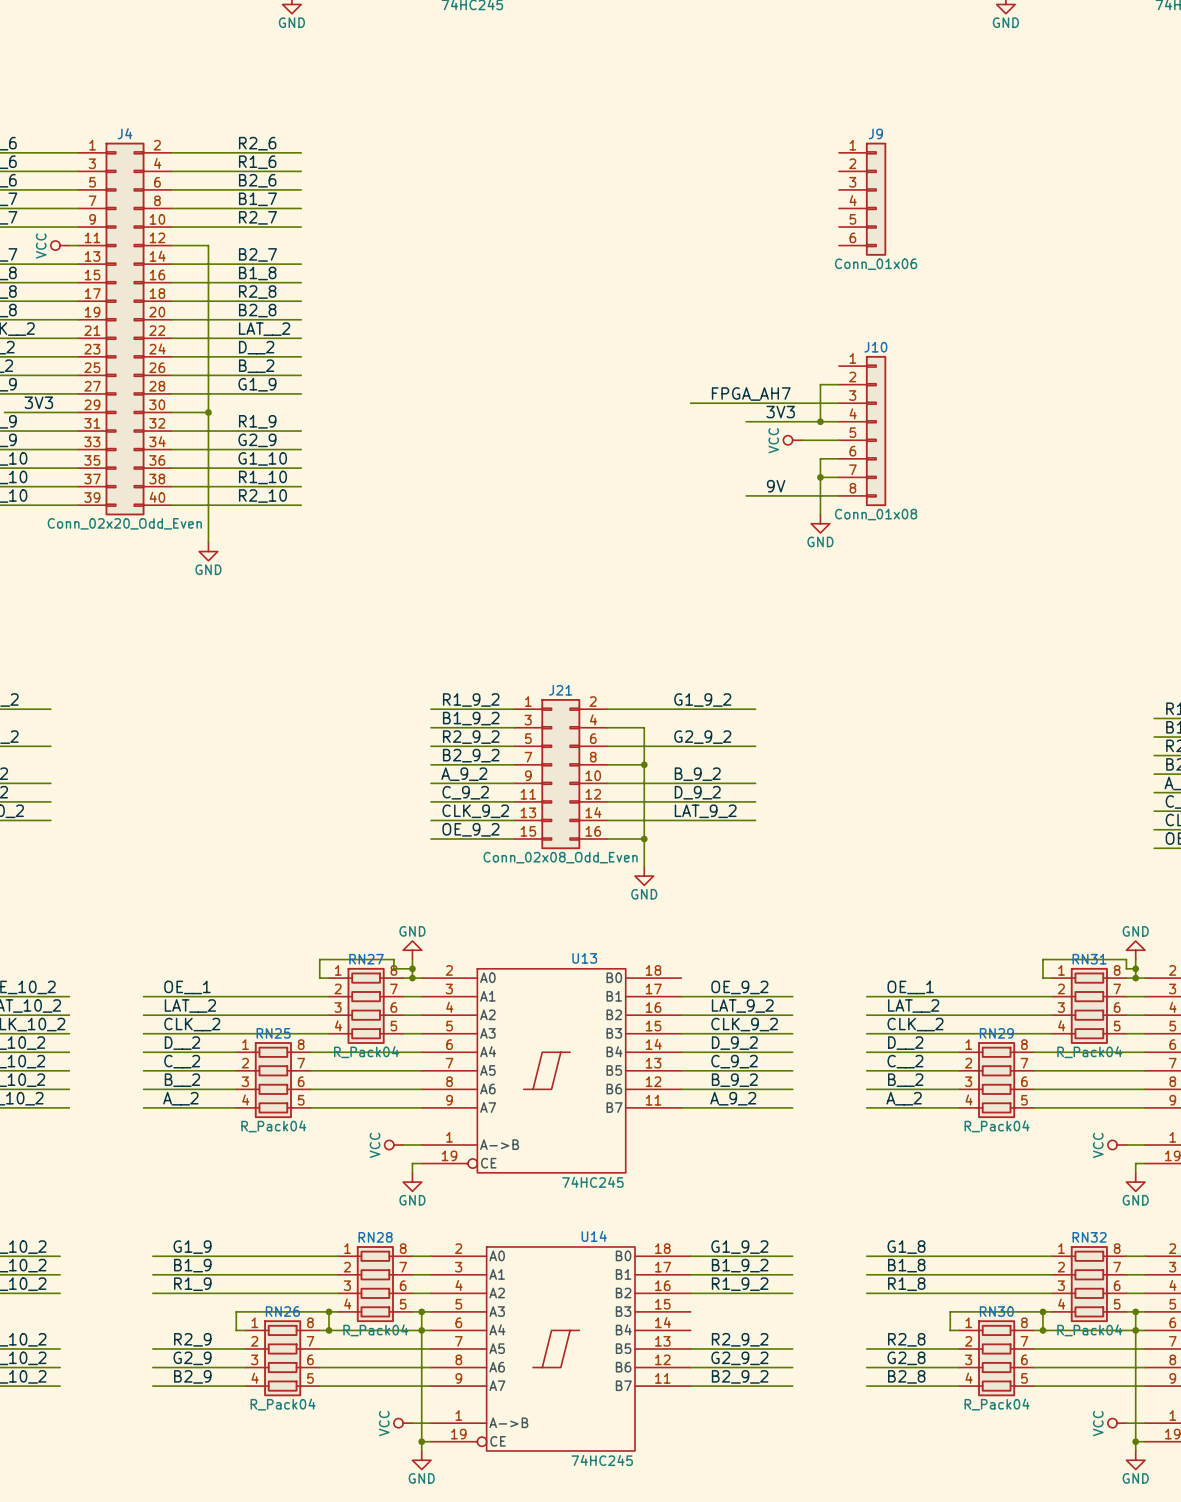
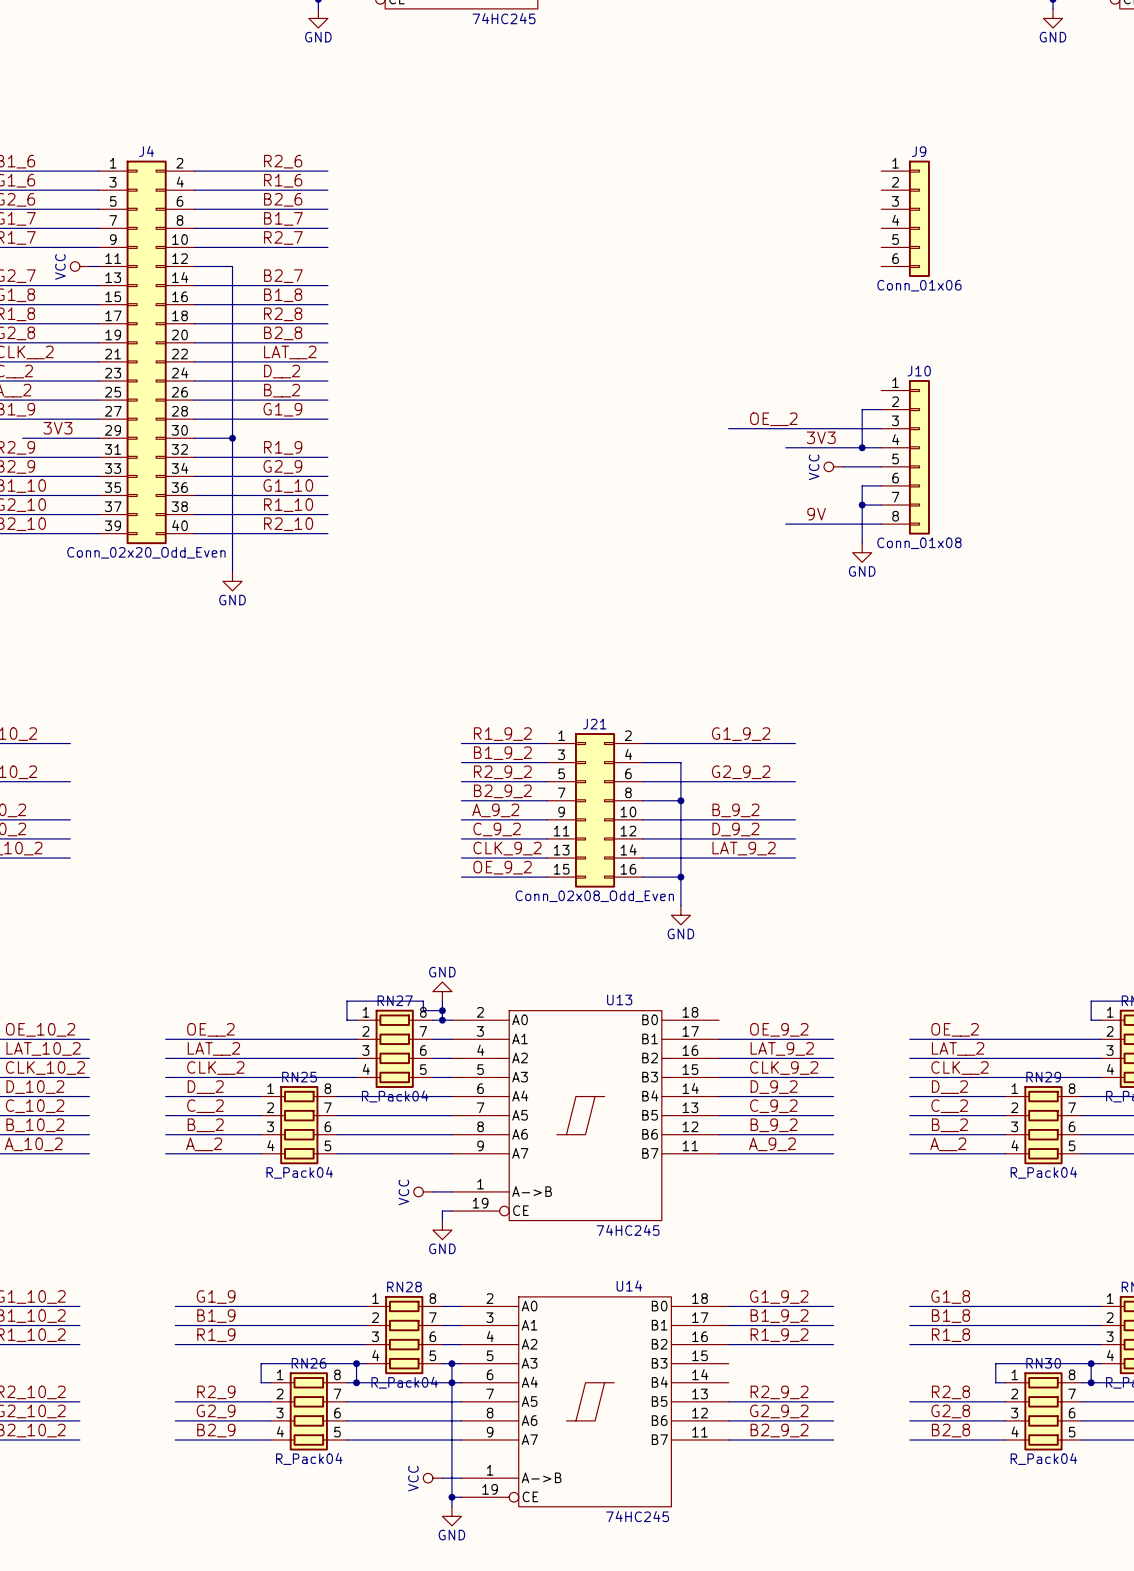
label: FPGA_AH7 (751, 394) -> OE__2 (773, 419)
label: OE__1 (187, 987) -> OE__2 (210, 1029)
label: OE__1 (910, 987) -> OE__2 (955, 1029)

